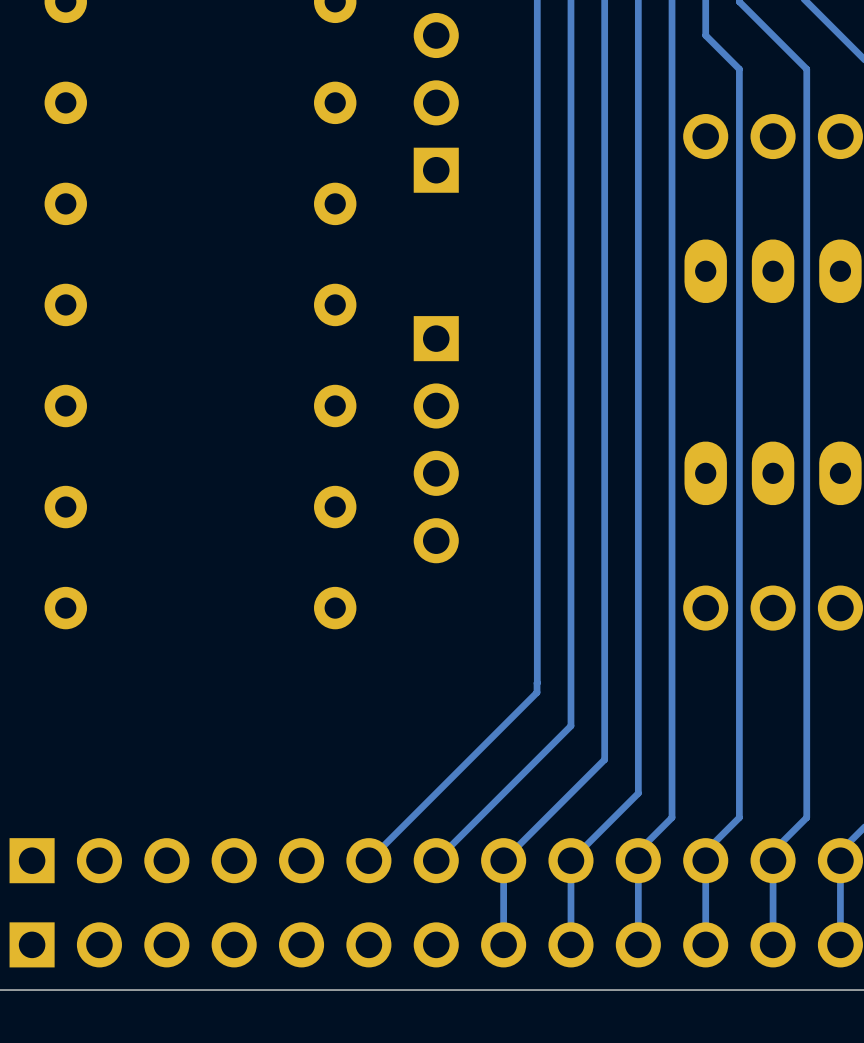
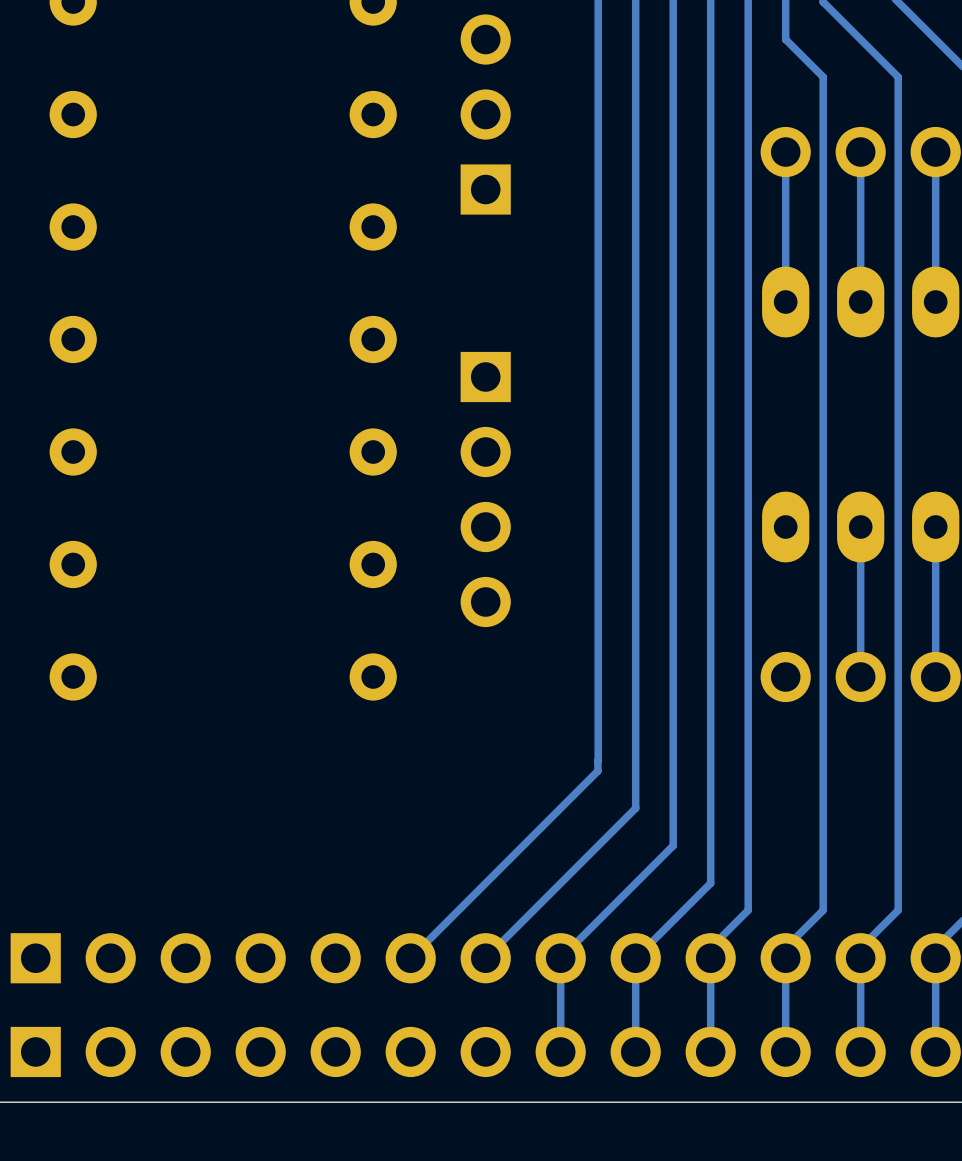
bottom track: none -> (785, 152) (785, 302)
bottom track: none -> (860, 152) (860, 302)
bottom track: none -> (935, 152) (935, 302)
bottom track: none -> (860, 527) (860, 676)
bottom track: none -> (935, 527) (935, 676)

